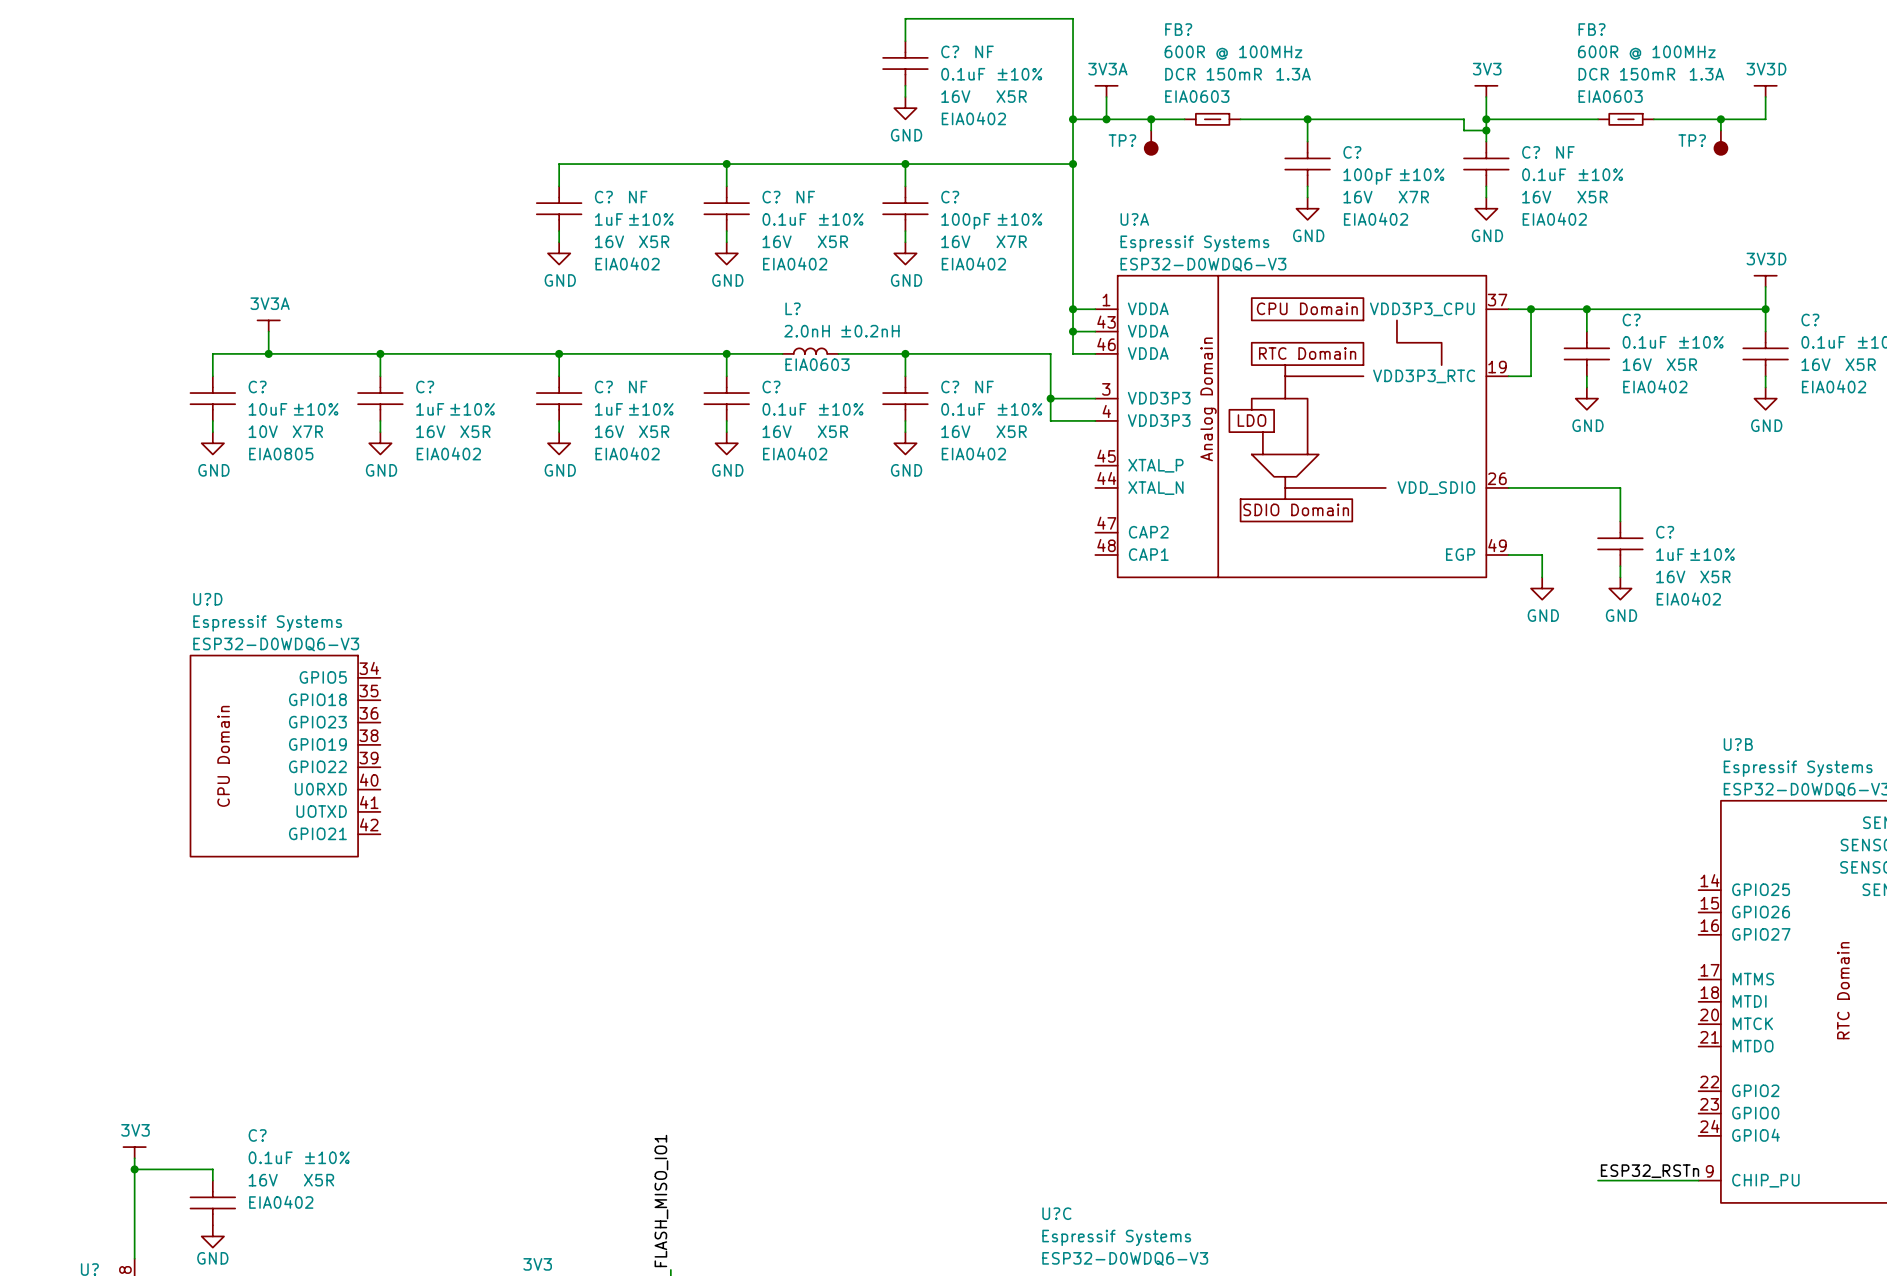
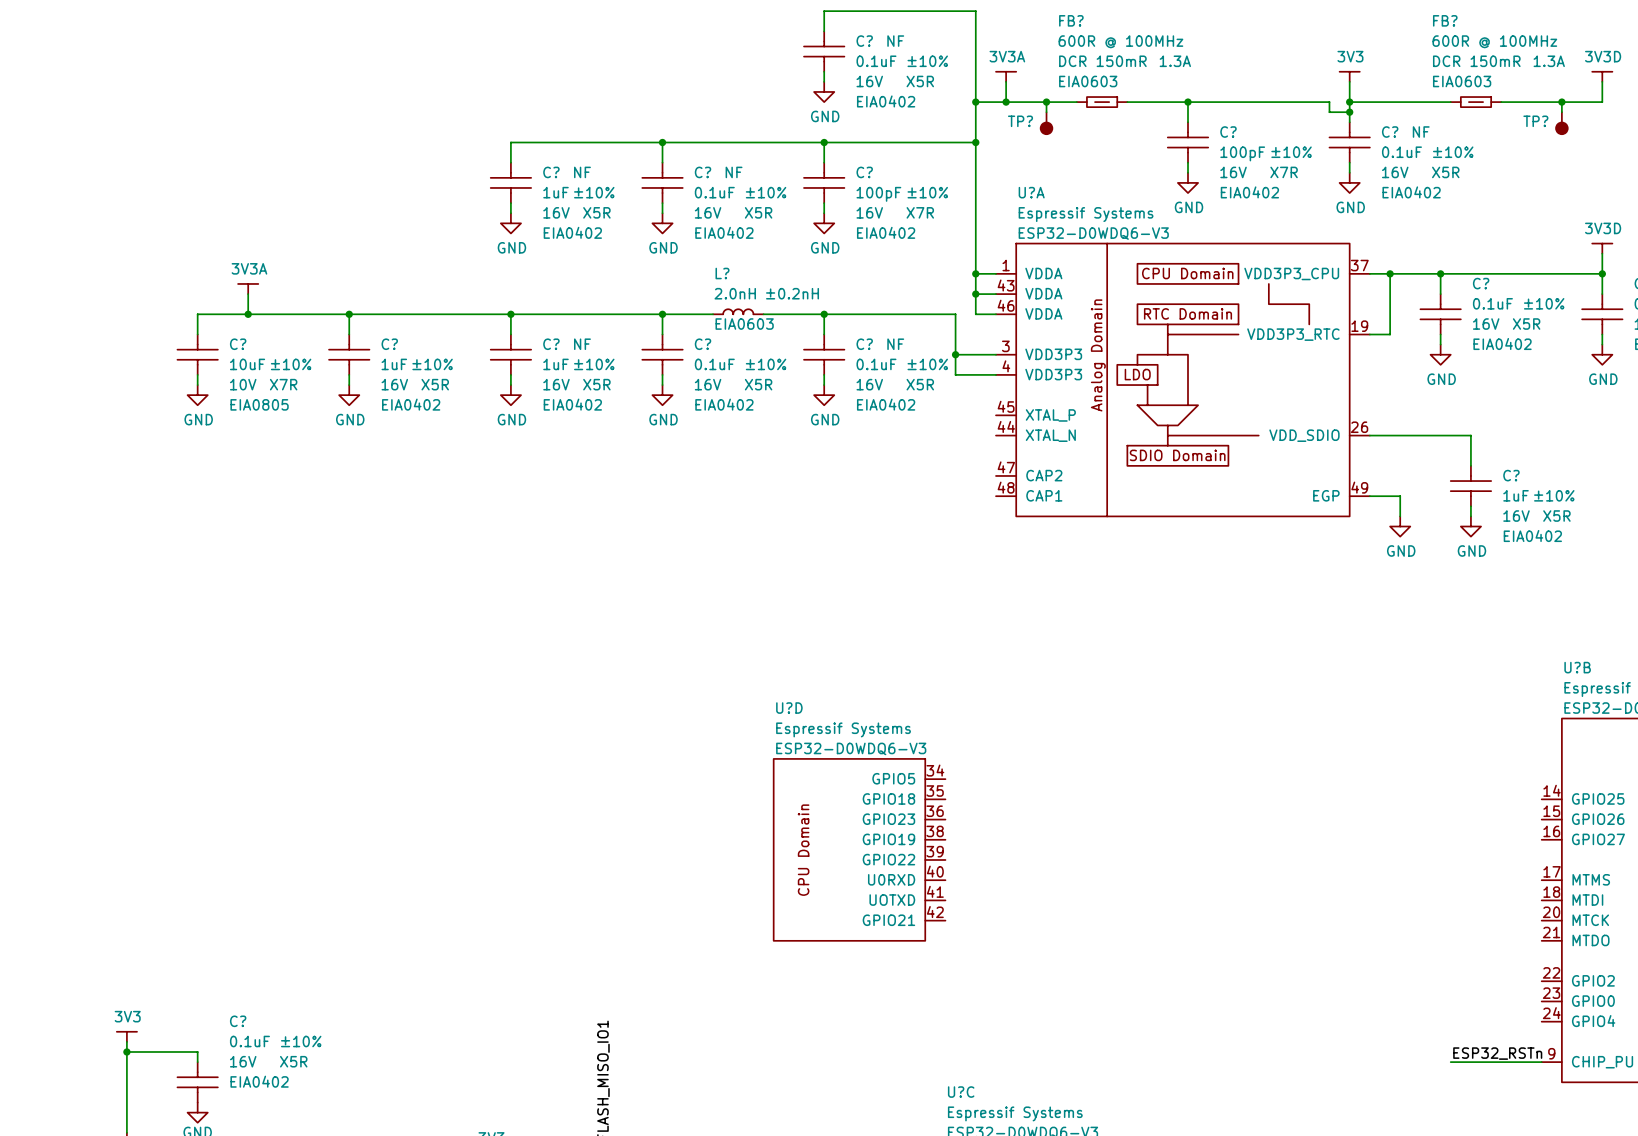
U?D: (285, 756) -> none
U?D: none -> (859, 849)

